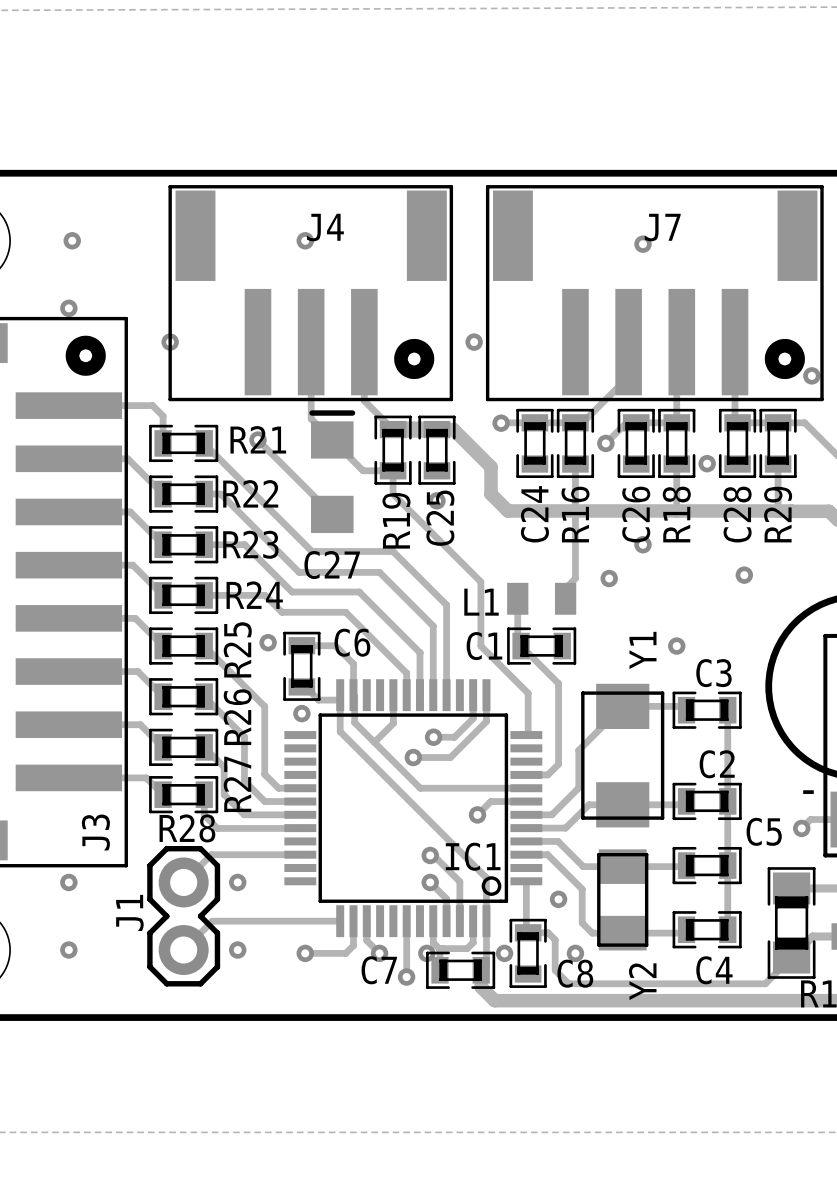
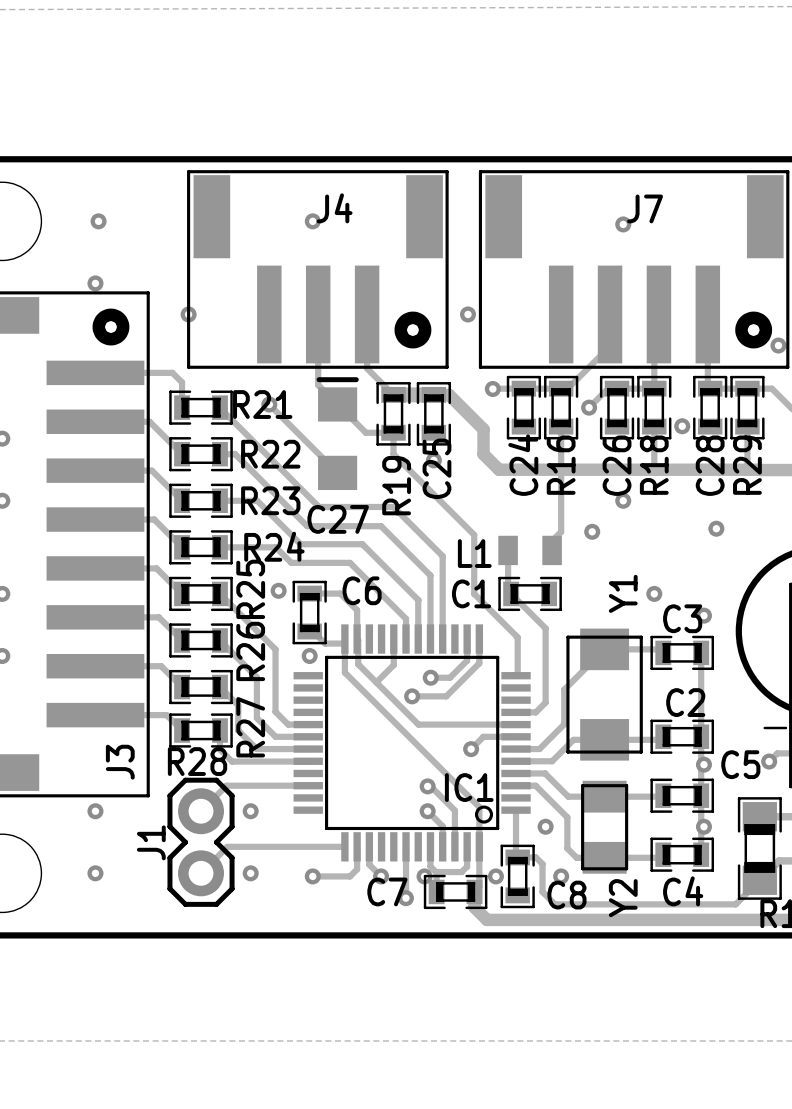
via: none -> (703, 615)
via: none -> (703, 764)
via: none -> (703, 826)

